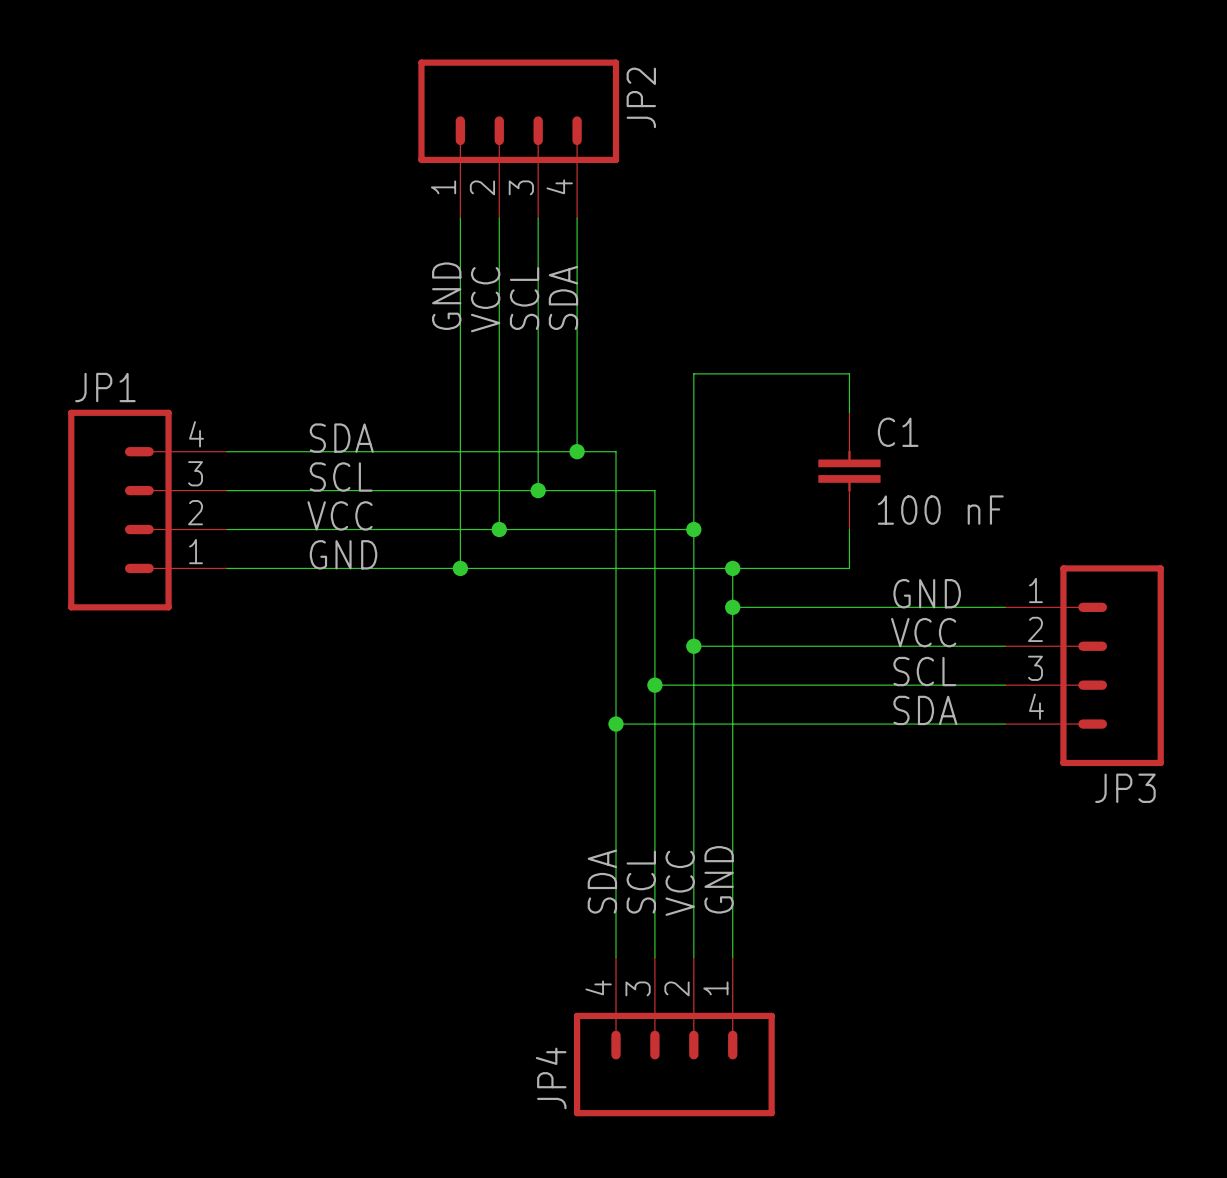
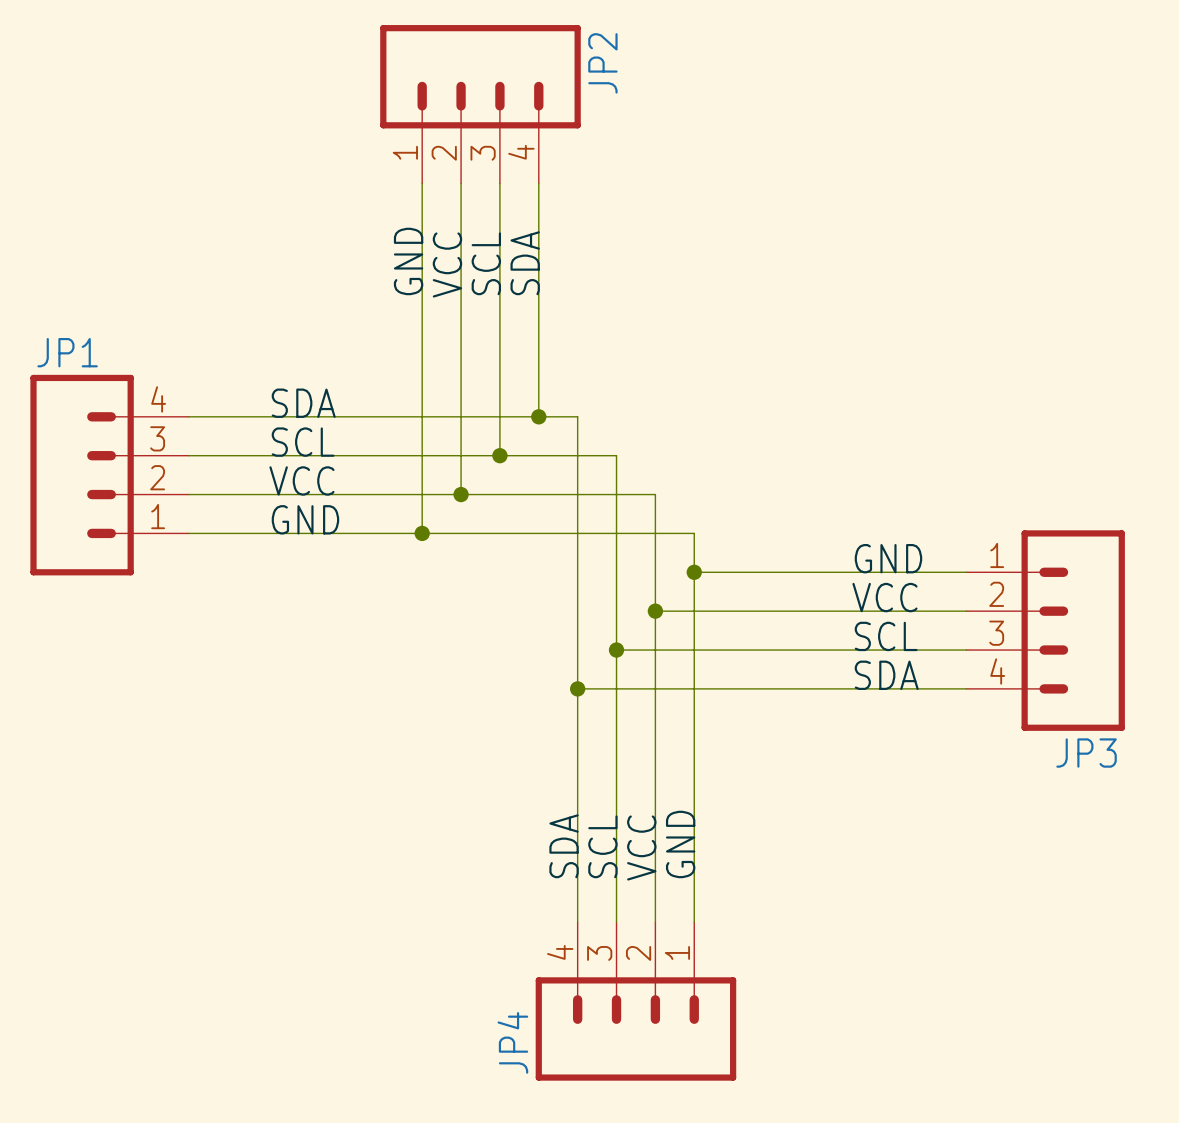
wire: (849, 412) (849, 373) (693, 373) (693, 529) -> none
C1: 100 nF (849, 471) -> none
junction: (693, 529) -> none
wire: (849, 529) (849, 568) (732, 568) -> none
junction: (732, 568) -> none

